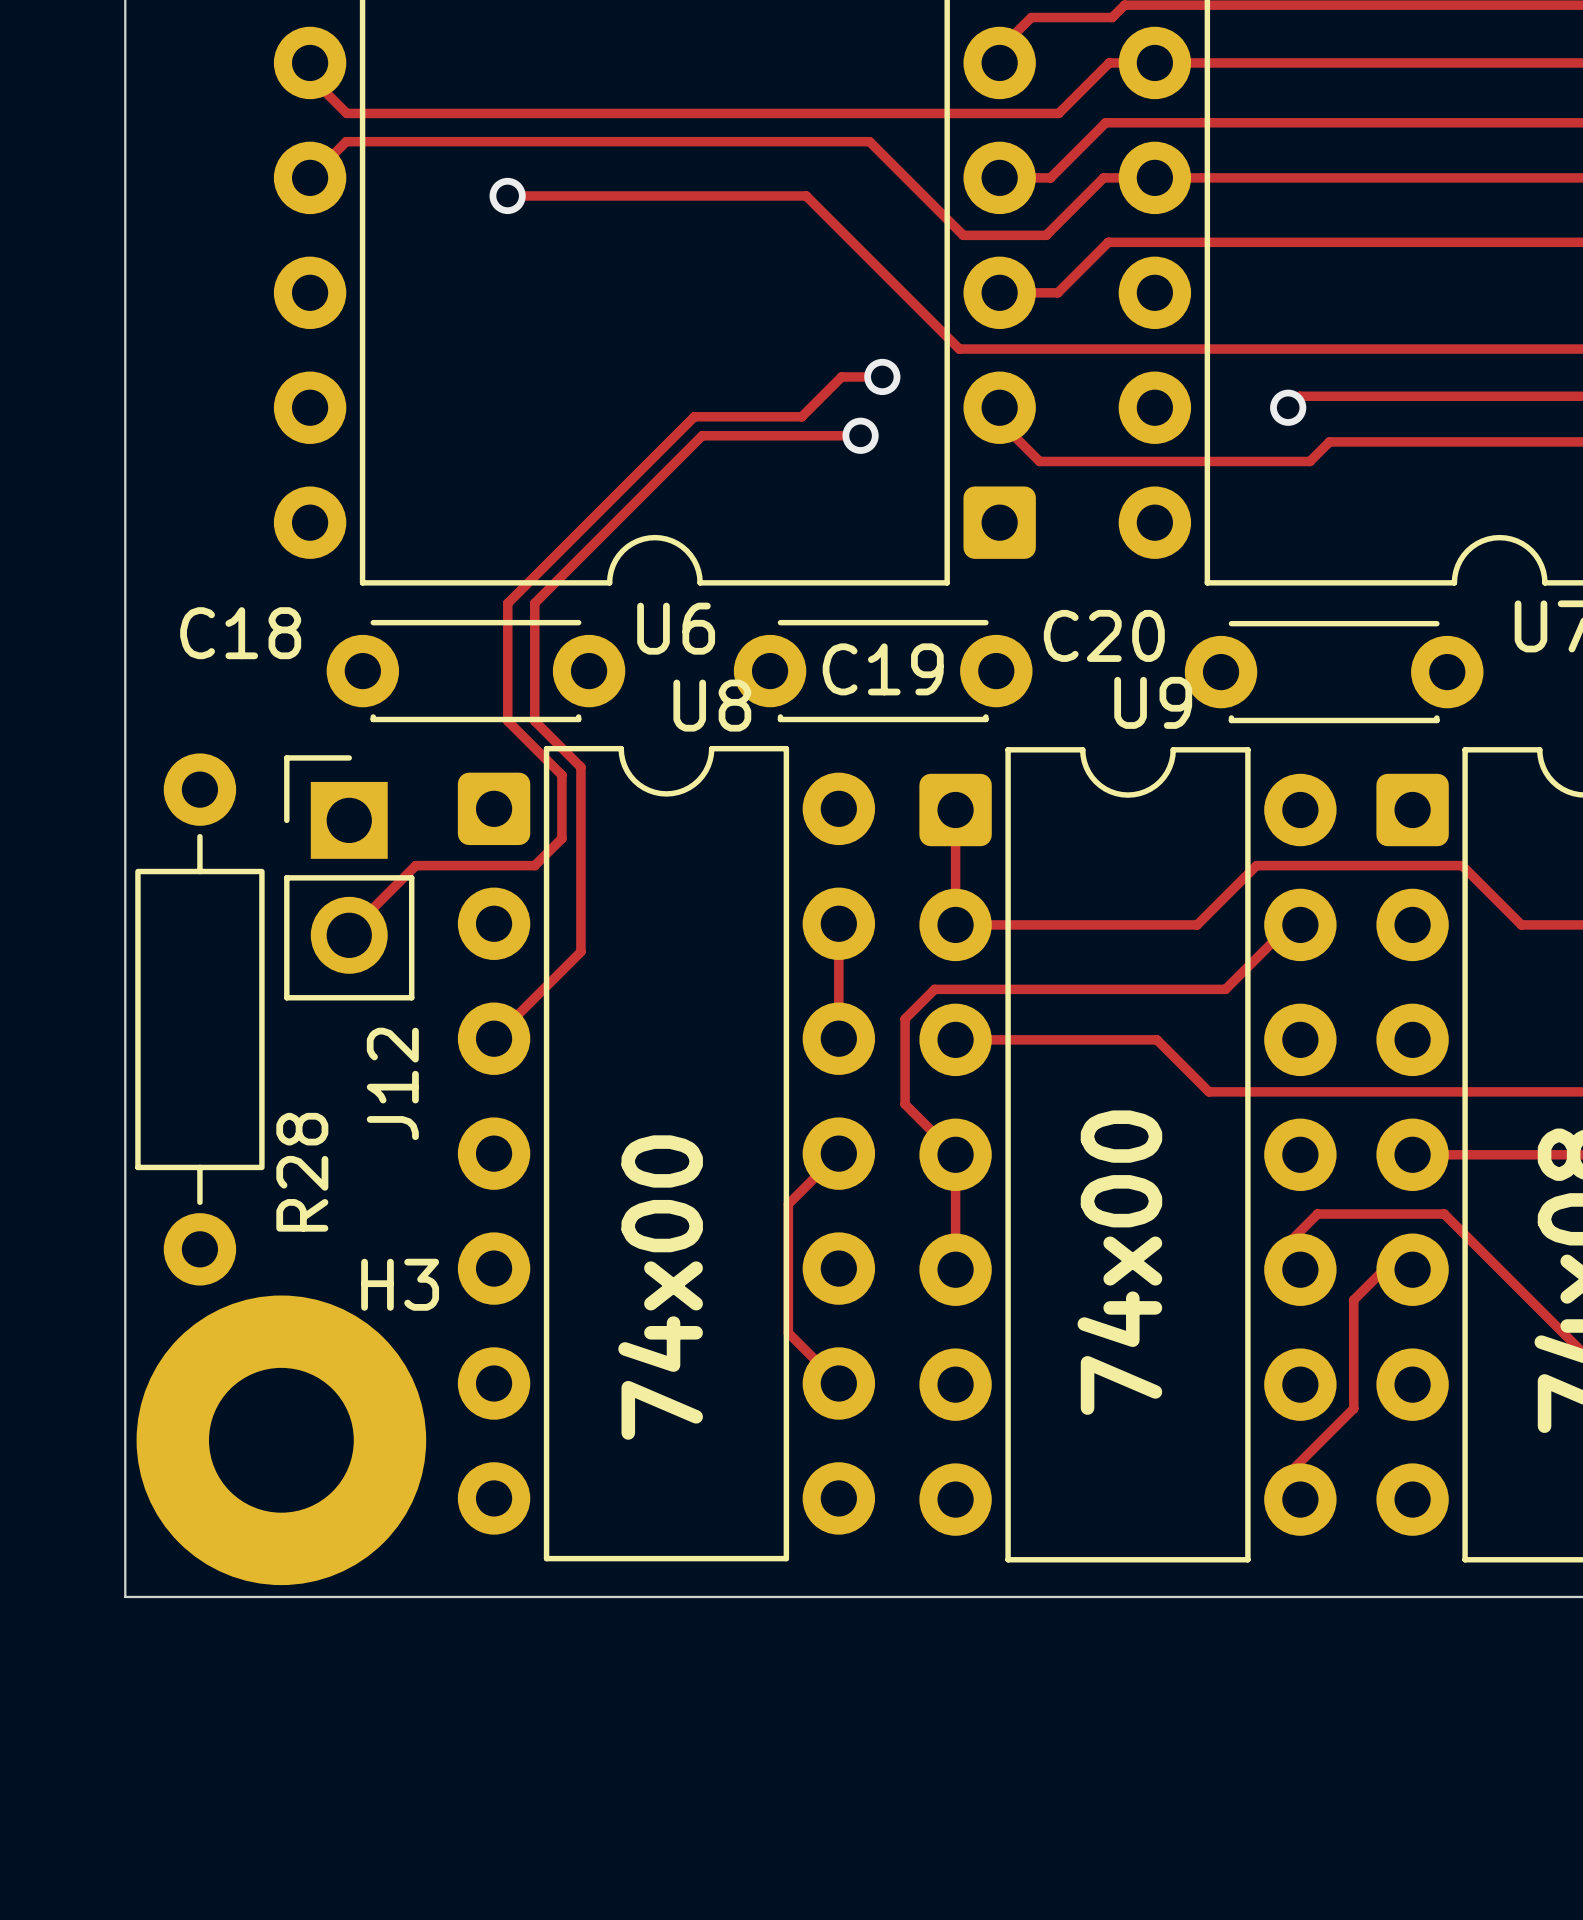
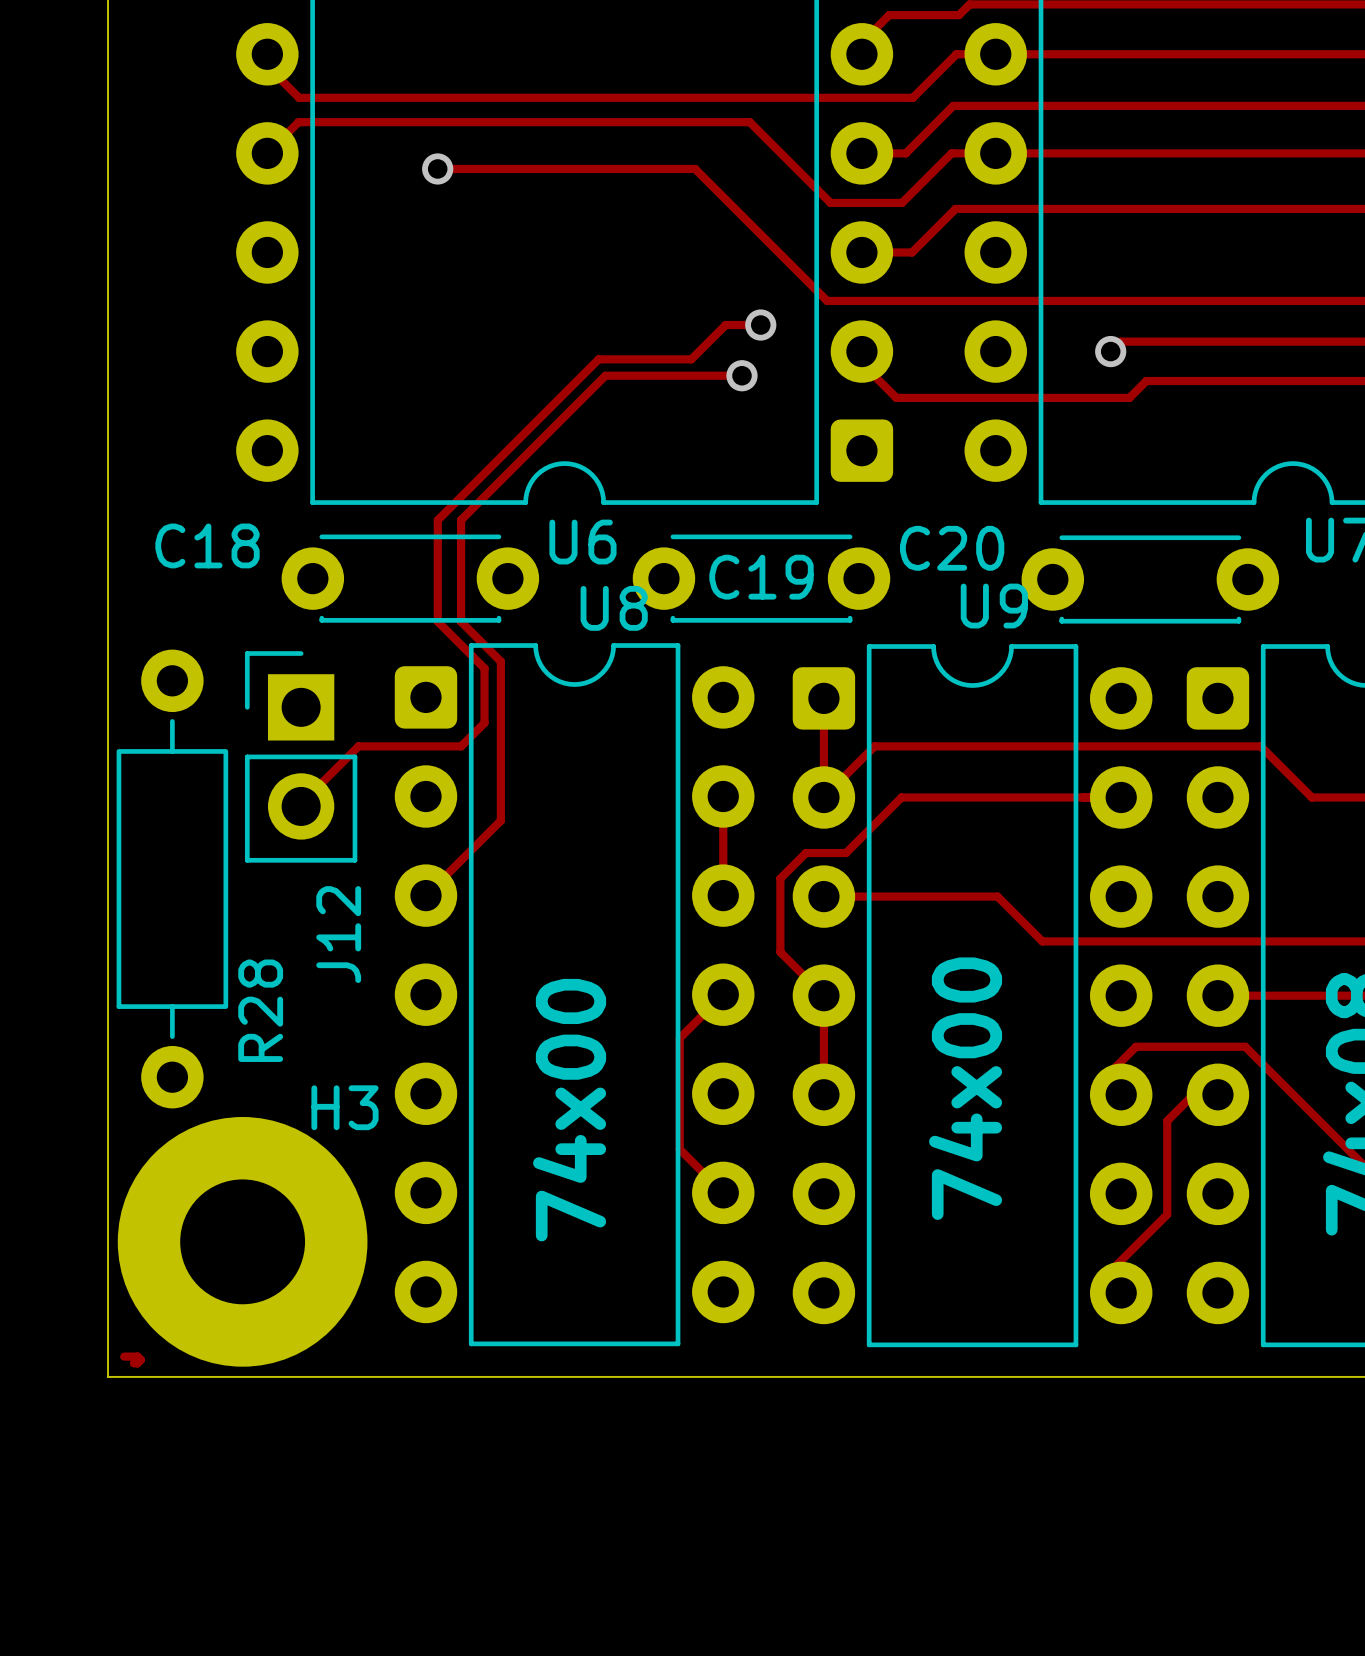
track: (1256, 865) (1197, 924) -> (1112, 797) (1032, 797)
track: none -> (1083, 746) (874, 746) (823, 797)
track: (955, 924) (1045, 924) -> (845, 853) (901, 797)
track: (1289, 924) (1225, 989) (981, 989) -> none
track: none -> (124, 1356) (137, 1356) (140, 1359) (137, 1363) (133, 1363)

